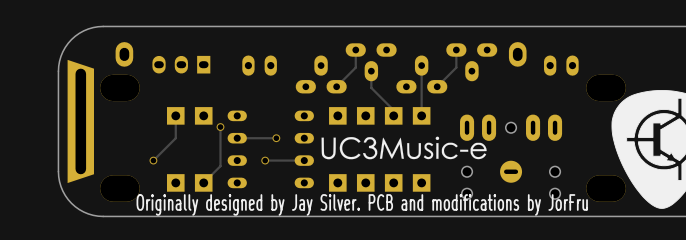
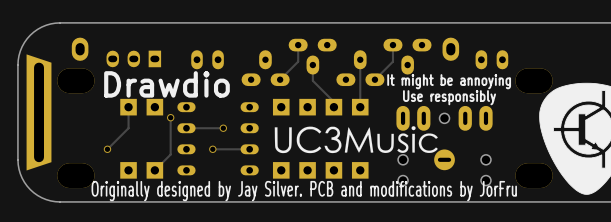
text: none -> It might be annoying (449, 81)
text: none -> Drawdio (166, 84)
text: none -> Use responsibly (449, 97)
drawing: [321, 136, 487, 160] -> none
drawing: none -> [274, 126, 438, 154]

